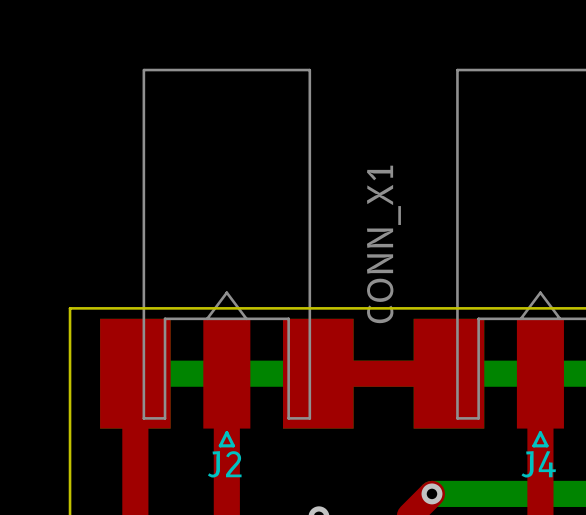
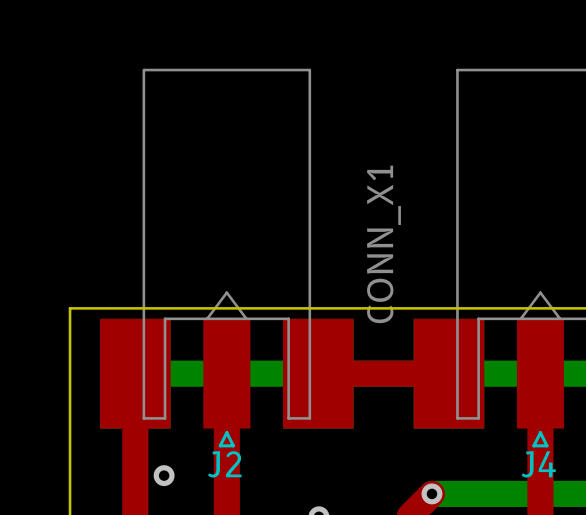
via: none -> (164, 475)

